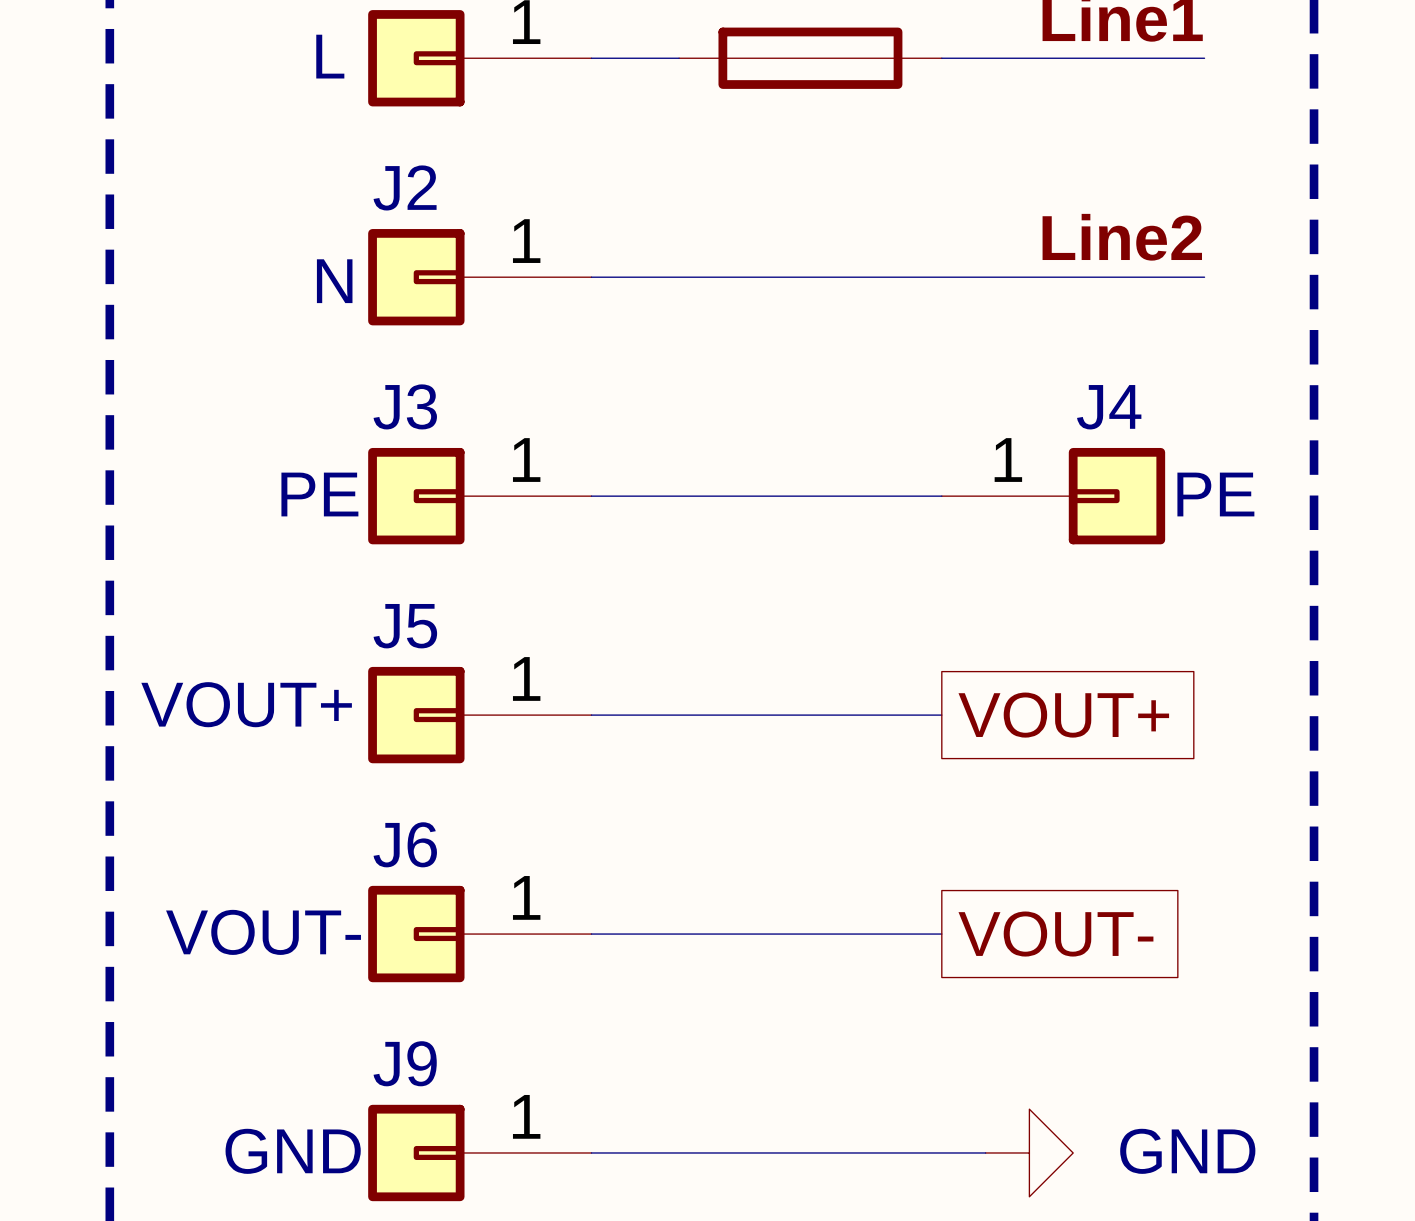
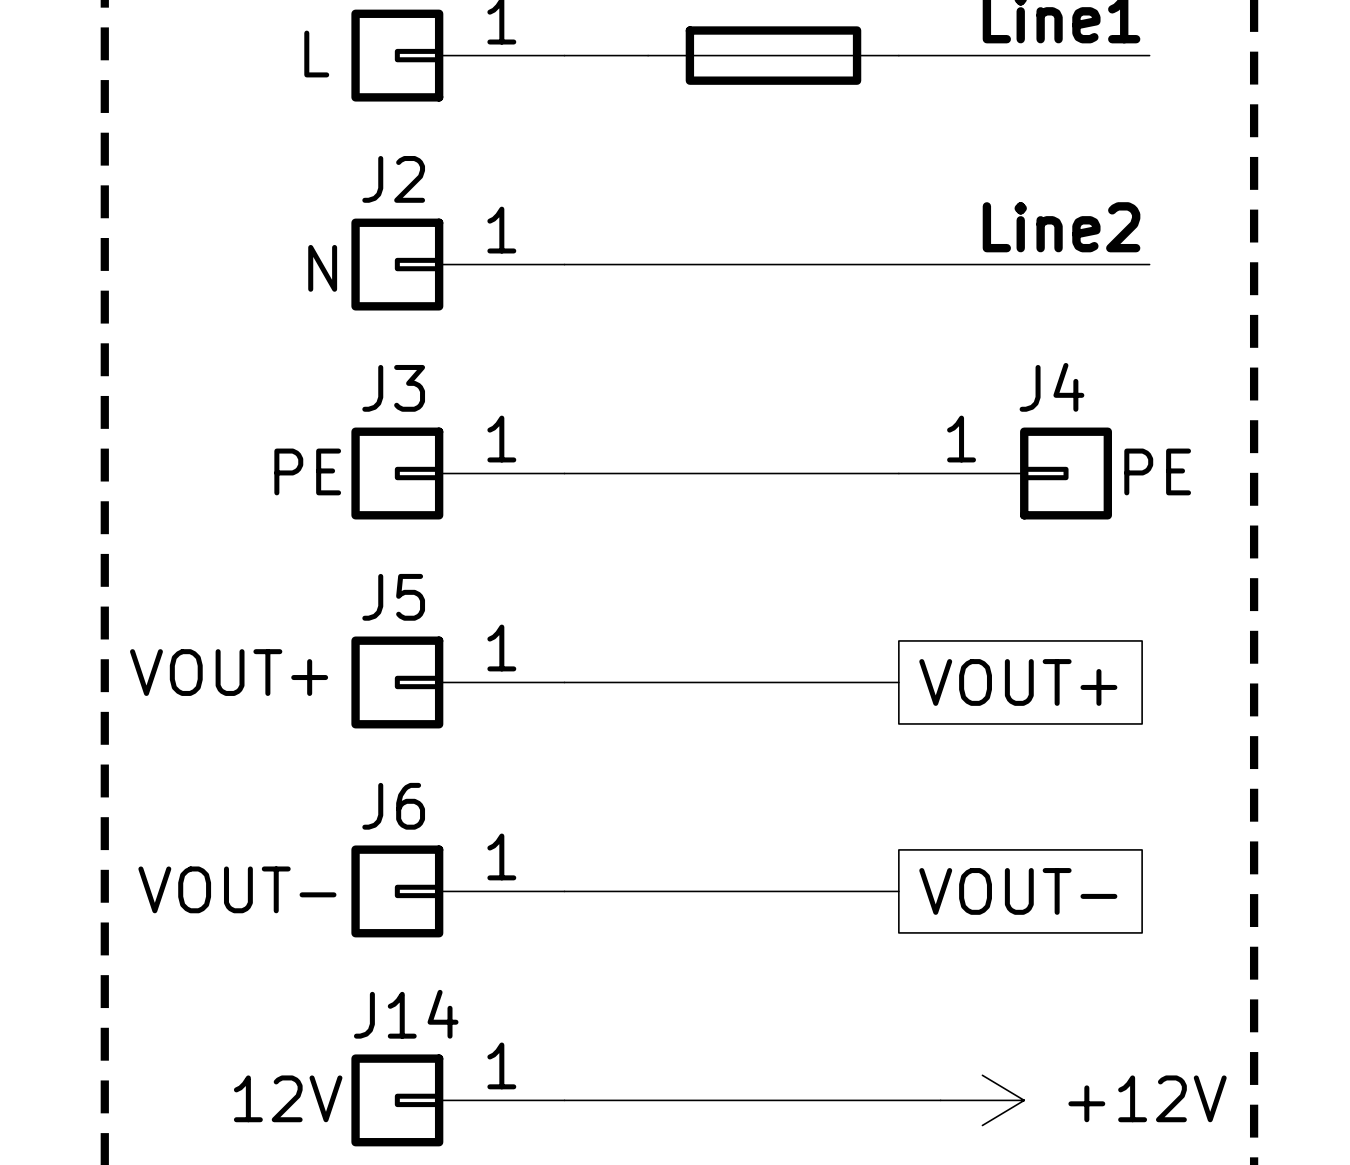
J9 name: J9 (405, 1063) -> J14 (406, 1014)
J9 value: GND (293, 1151) -> 12V (288, 1098)
power symbol: GND (1029, 1152) -> +12V (982, 1100)

